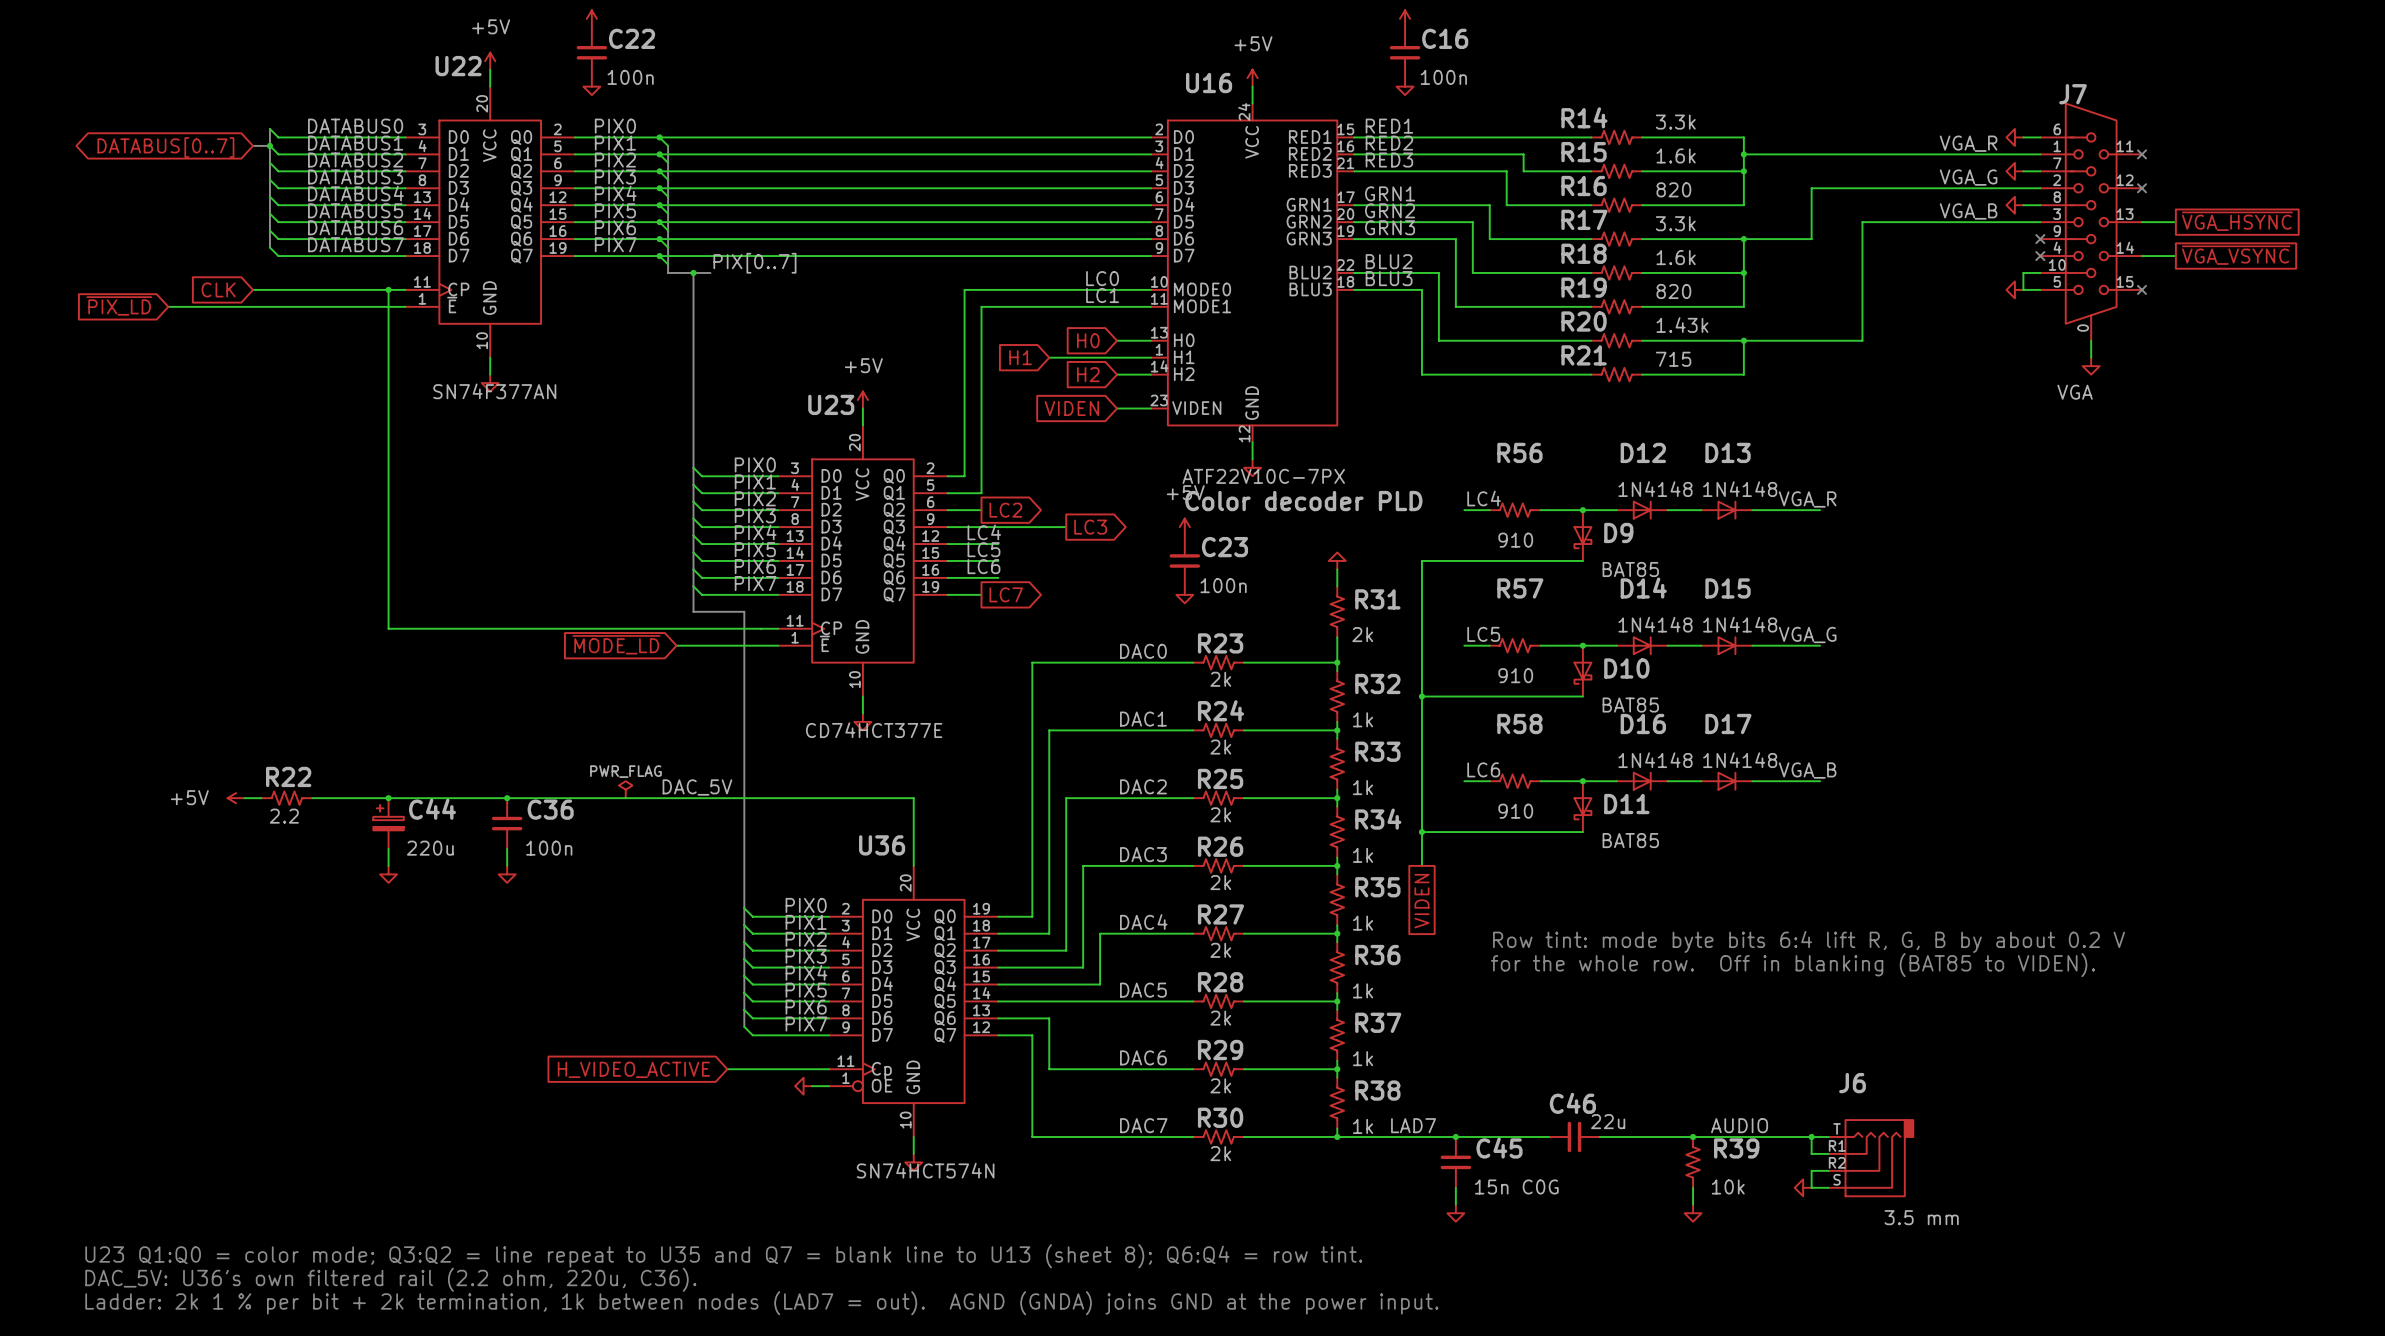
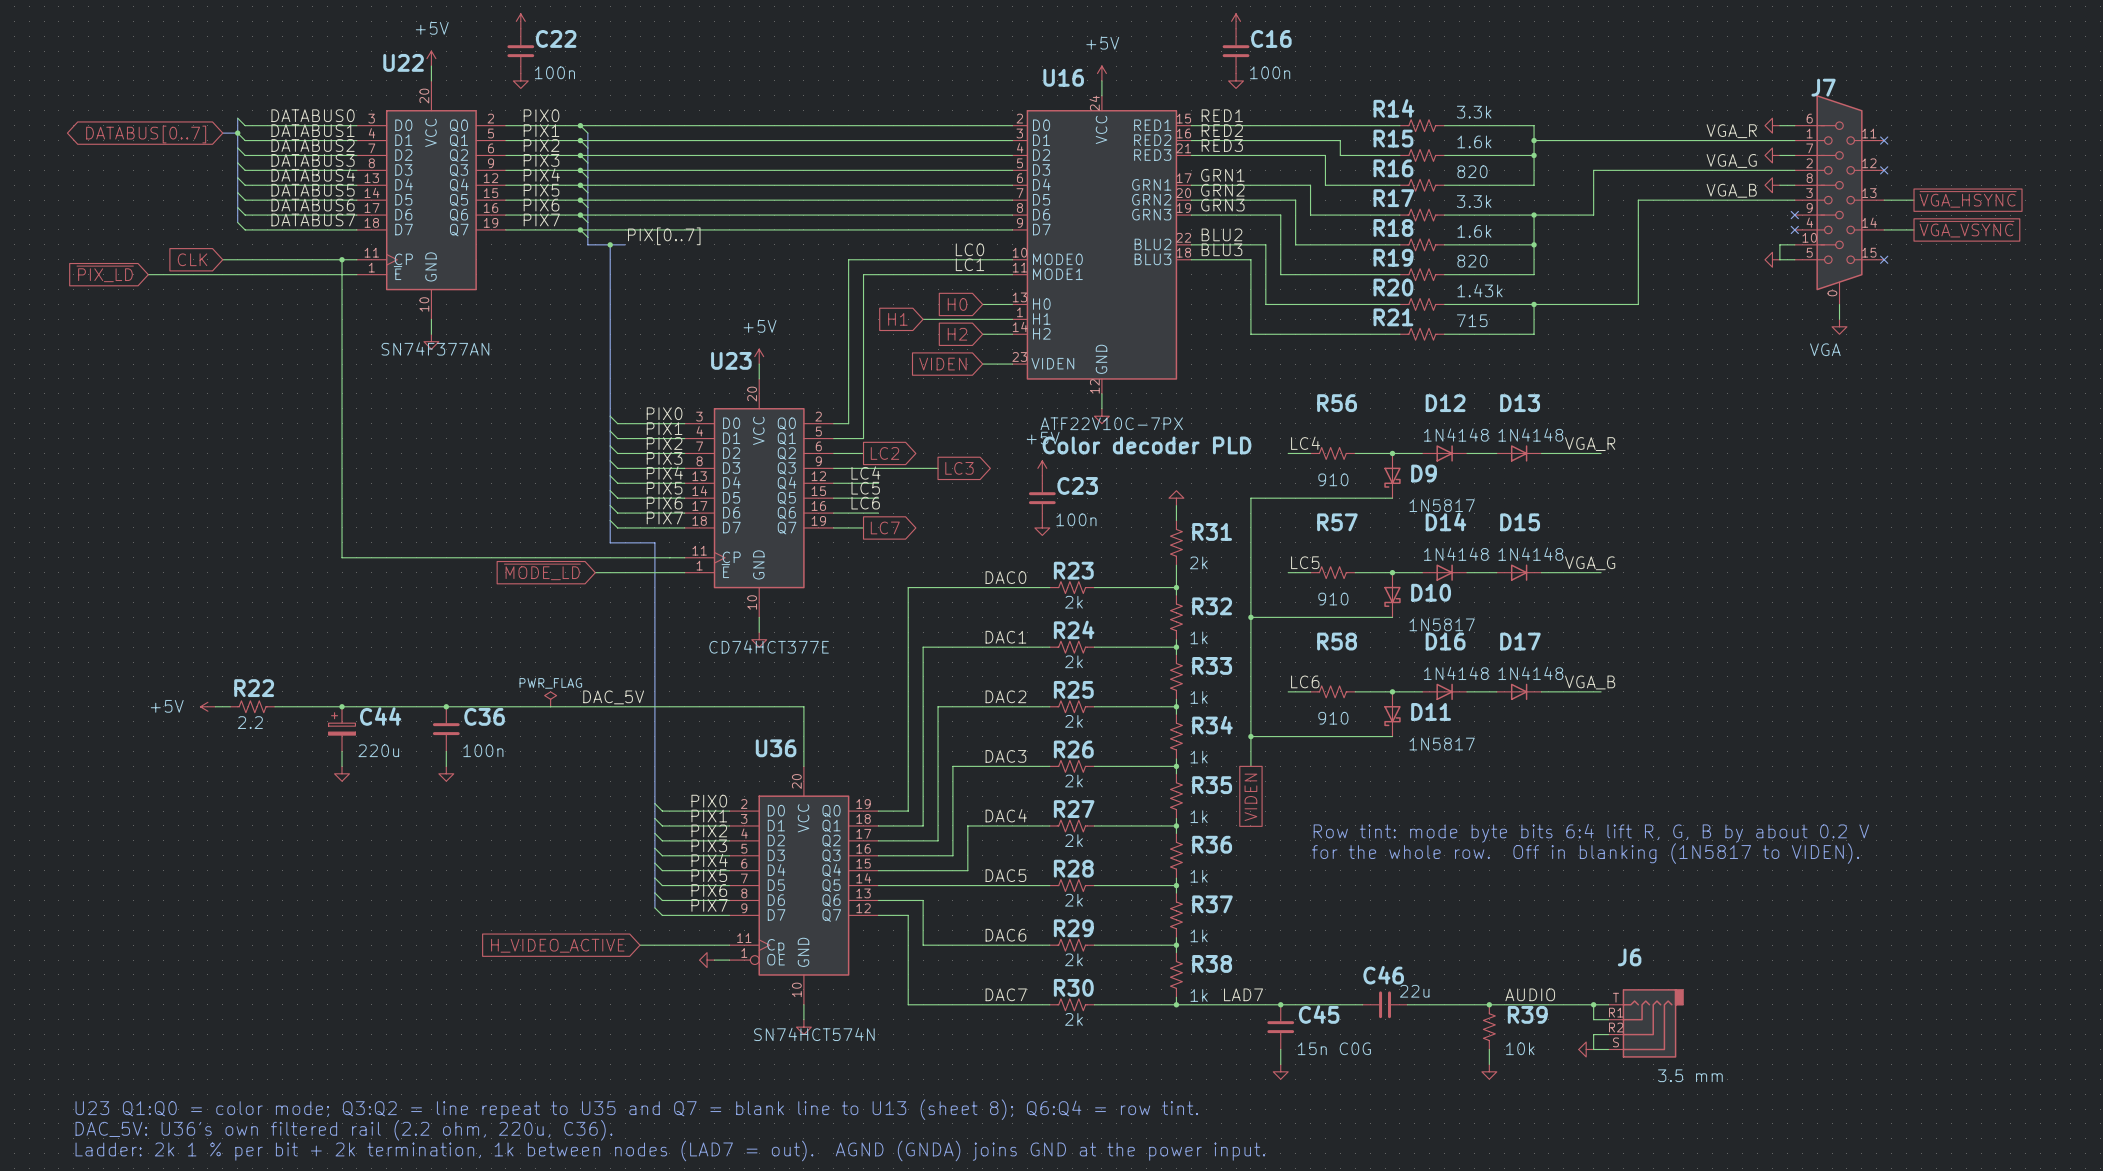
D9 value: BAT85 (1630, 569) -> 1N5817 (1442, 505)
D10 value: BAT85 (1630, 705) -> 1N5817 (1442, 624)
D11 value: BAT85 (1630, 840) -> 1N5817 (1442, 744)
text: for the whole row. Off in blanking (BAT85 to VIDEN). (1792, 965) -> for the whole row. Off in blanking (1N5817 to VIDEN). (1585, 853)

